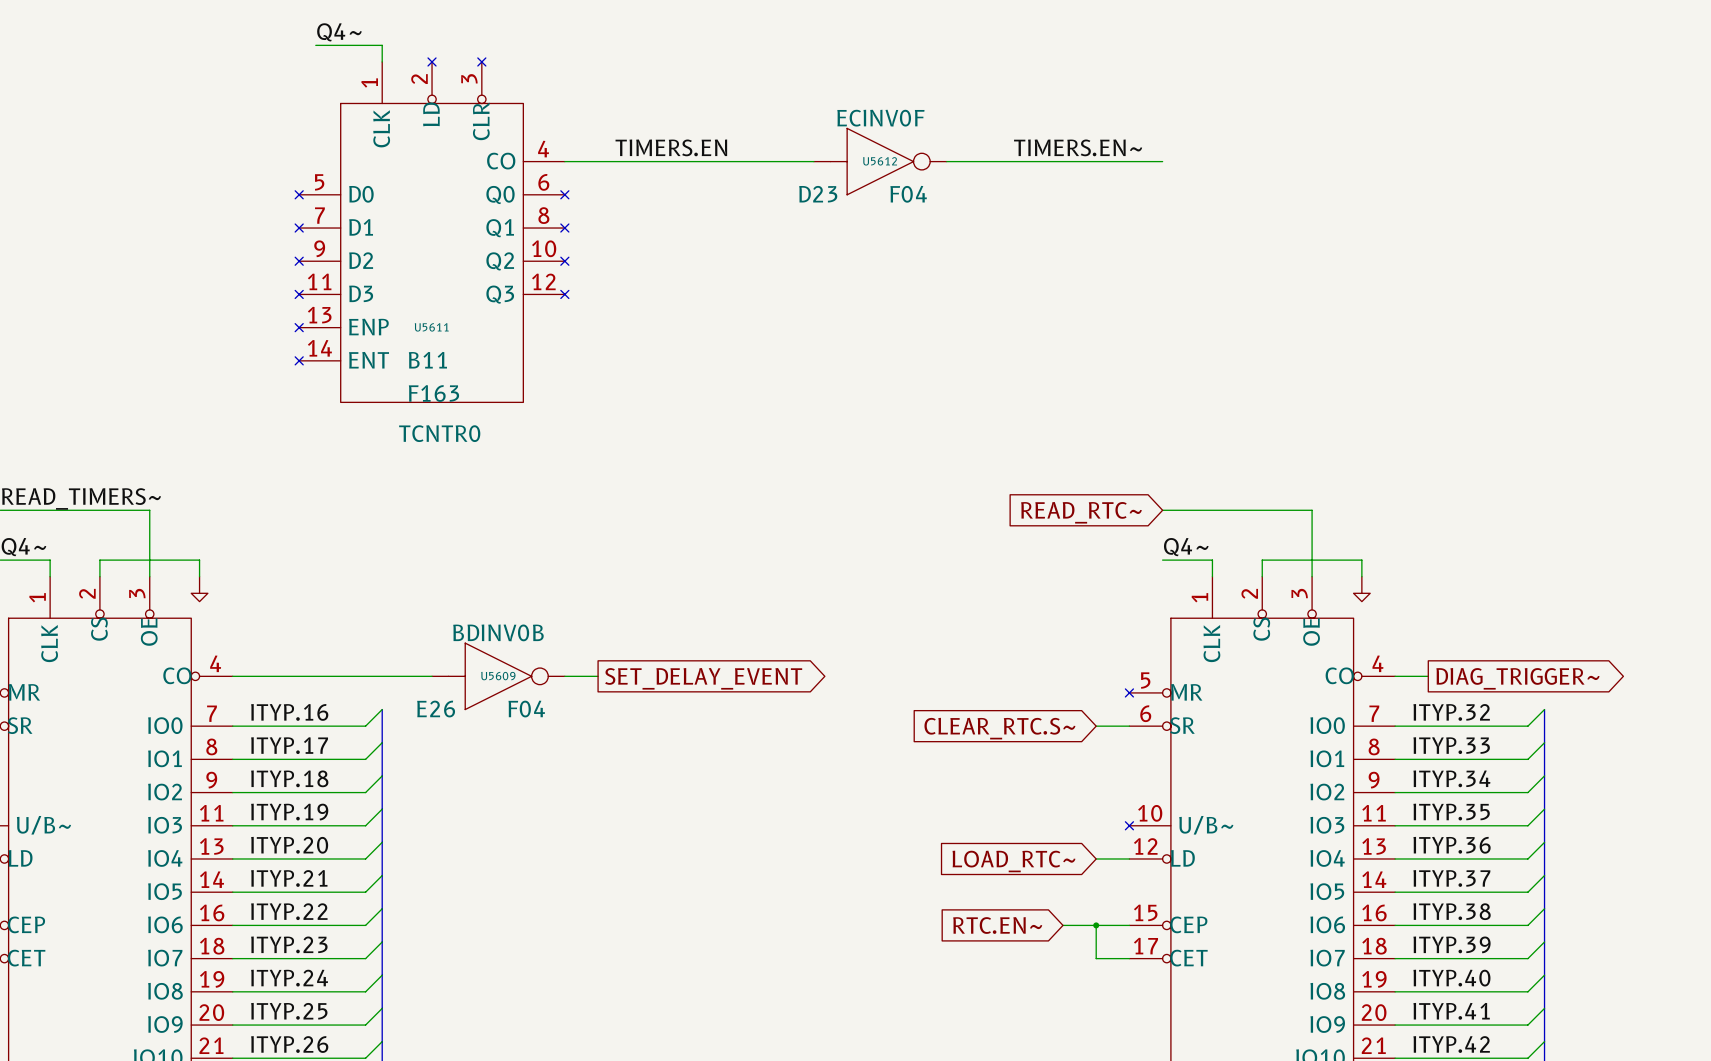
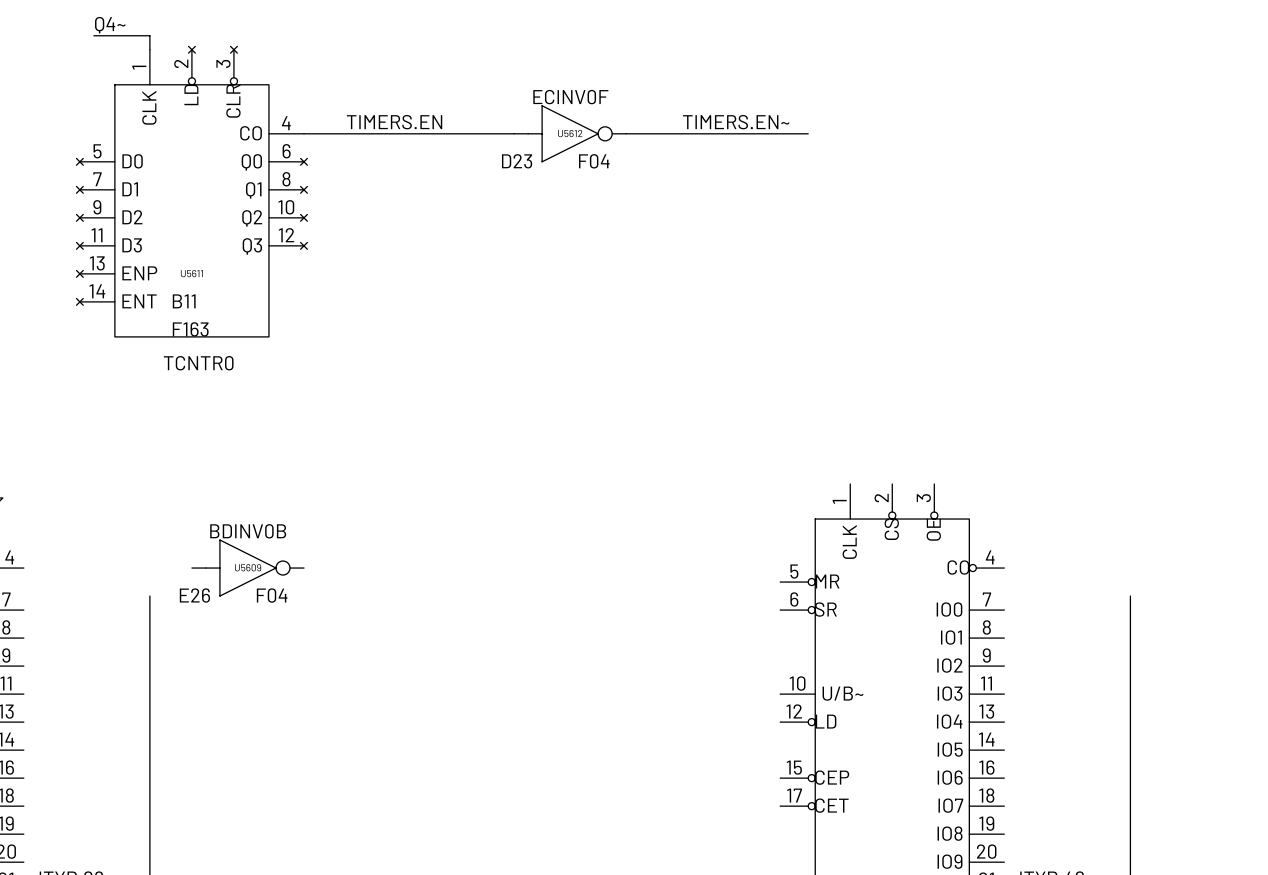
wire: (1162, 510) (1312, 510) (1312, 576) -> none
global label: READ_RTC~ (1081, 512) -> none
label: Q4~ (1186, 547) -> none
wire: (1162, 560) (1212, 560) (1212, 576) -> none
wire: (1262, 576) (1262, 560) (1361, 560) (1361, 576) -> none
power symbol: (1361, 589) -> none
wire: (232, 676) (432, 676) -> none
wire: (564, 676) (598, 676) -> none
wire: (1395, 676) (1428, 676) -> none
global label: SET_DELAY_EVENT (703, 678) -> none
global label: DIAG_TRIGGER~ (1517, 678) -> none
no-connect mark: (1129, 692) -> none
wire: (382, 709) (365, 726) (232, 726) -> none
wire: (1544, 709) (1527, 726) (1395, 726) -> none
label: ITYP.16 (289, 712) -> none
label: ITYP.32 (1451, 712) -> none
wire: (1096, 726) (1129, 726) -> none
global label: CLEAR_RTC.S~ (999, 728) -> none
wire: (382, 742) (365, 759) (232, 759) -> none
wire: (1544, 742) (1527, 759) (1395, 759) -> none
label: ITYP.17 (289, 745) -> none
label: ITYP.33 (1451, 745) -> none
wire: (382, 775) (365, 792) (232, 792) -> none
wire: (1544, 775) (1527, 792) (1395, 792) -> none
label: ITYP.18 (289, 778) -> none
label: ITYP.34 (1451, 778) -> none
wire: (382, 809) (365, 825) (232, 825) -> none
wire: (1544, 809) (1527, 825) (1395, 825) -> none
label: ITYP.19 (289, 812) -> none
label: ITYP.35 (1451, 812) -> none
no-connect mark: (1129, 825) -> none
wire: (382, 842) (365, 858) (232, 858) -> none
wire: (1544, 842) (1527, 858) (1395, 858) -> none
label: ITYP.20 (289, 845) -> none
label: ITYP.36 (1452, 845) -> none
wire: (1096, 858) (1129, 858) -> none
global label: LOAD_RTC~ (1013, 861) -> none
wire: (382, 875) (365, 892) (232, 892) -> none
wire: (1544, 875) (1527, 892) (1395, 892) -> none
label: ITYP.21 (289, 878) -> none
label: ITYP.37 (1451, 878) -> none
wire: (382, 908) (365, 925) (232, 925) -> none
wire: (1544, 908) (1527, 925) (1395, 925) -> none
label: ITYP.22 (289, 911) -> none
label: ITYP.38 (1452, 911) -> none
global label: RTC.EN~ (997, 925) -> none
wire: (1062, 925) (1129, 925) -> none
wire: (1096, 925) (1096, 958) (1129, 958) -> none
junction: (1096, 925) -> none
wire: (382, 942) (365, 958) (232, 958) -> none
wire: (1544, 942) (1527, 958) (1395, 958) -> none
label: ITYP.23 (289, 944) -> none
label: ITYP.39 (1452, 944) -> none
wire: (382, 975) (365, 991) (232, 991) -> none
wire: (1544, 975) (1527, 991) (1395, 991) -> none
label: ITYP.24 (289, 978) -> none
label: ITYP.40 (1451, 978) -> none
wire: (382, 1008) (365, 1025) (232, 1025) -> none
wire: (1544, 1008) (1527, 1025) (1395, 1025) -> none
label: ITYP.25 (289, 1011) -> none
label: ITYP.41 (1451, 1011) -> none

